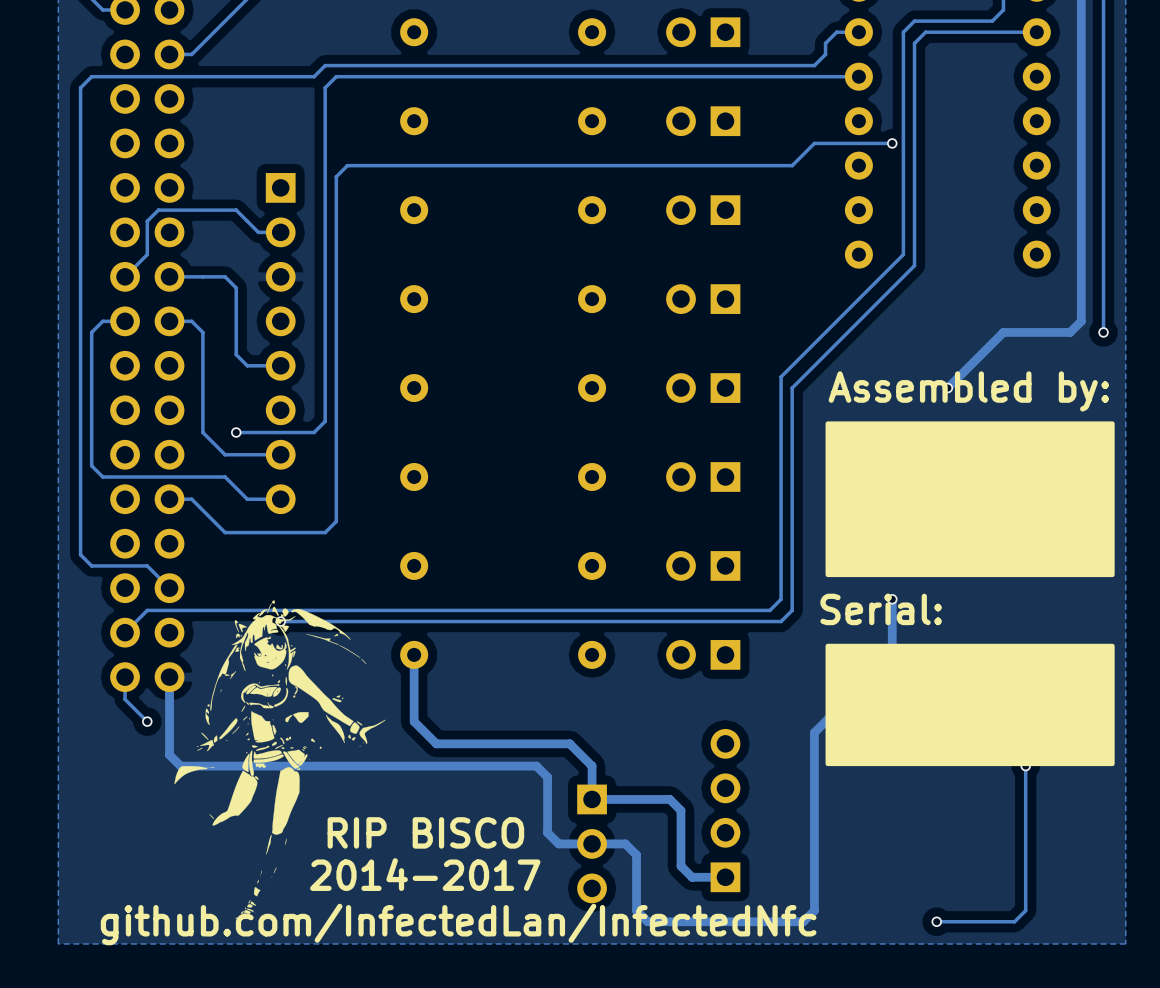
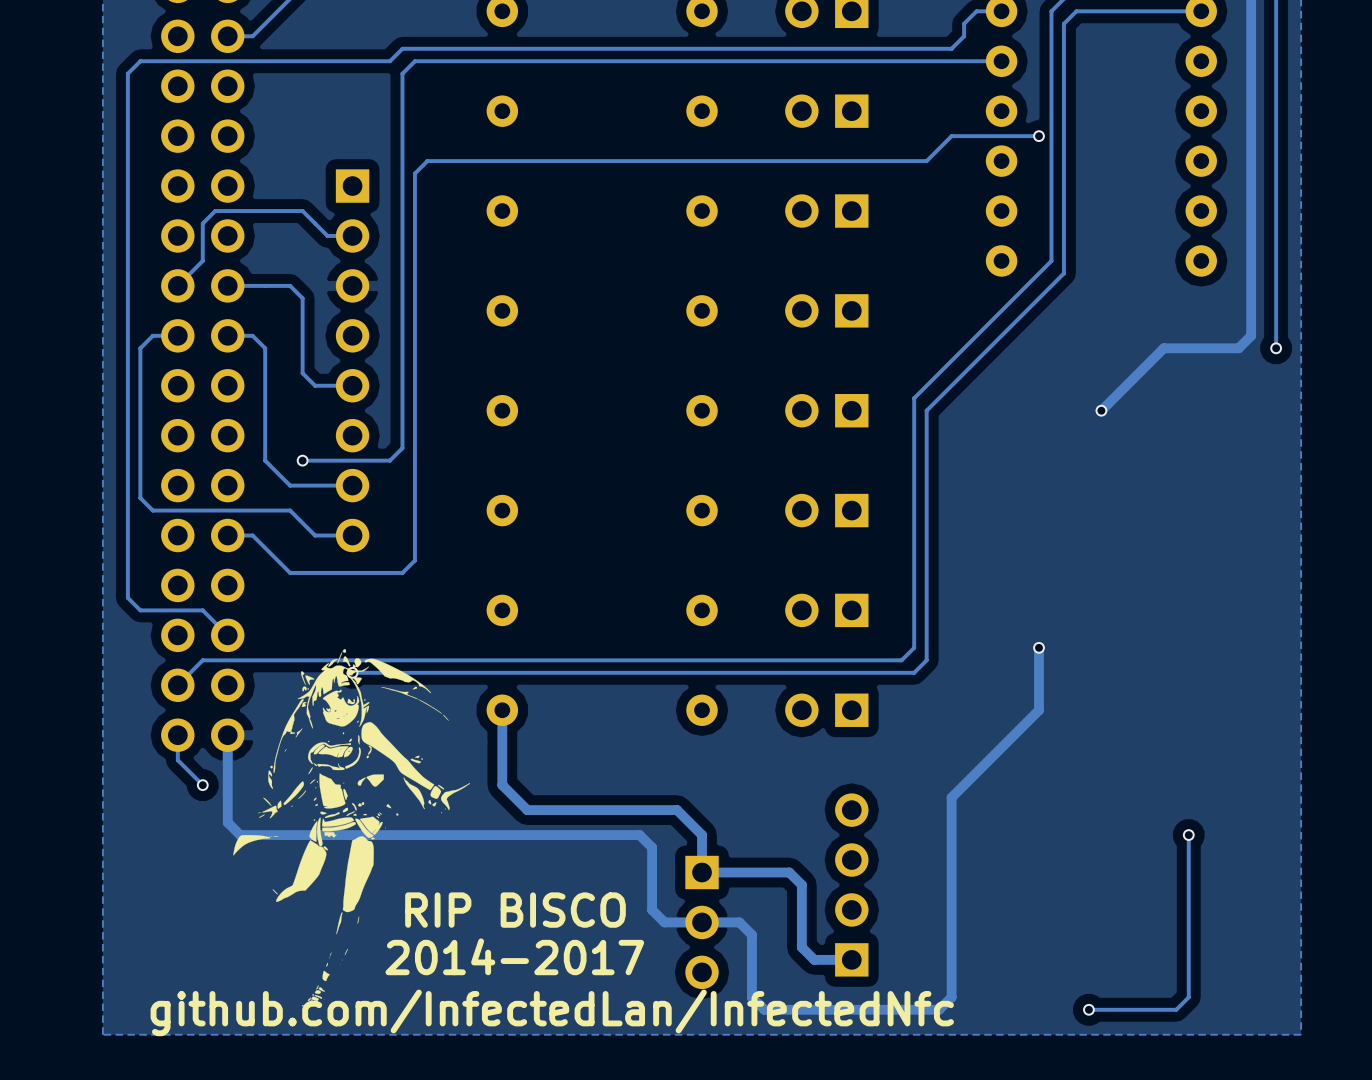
text: Assembled by: (968, 391) -> none
drawing: [825, 421, 1115, 578] -> none
text: Serial: (881, 609) -> none
drawing: [825, 643, 1115, 767] -> none

